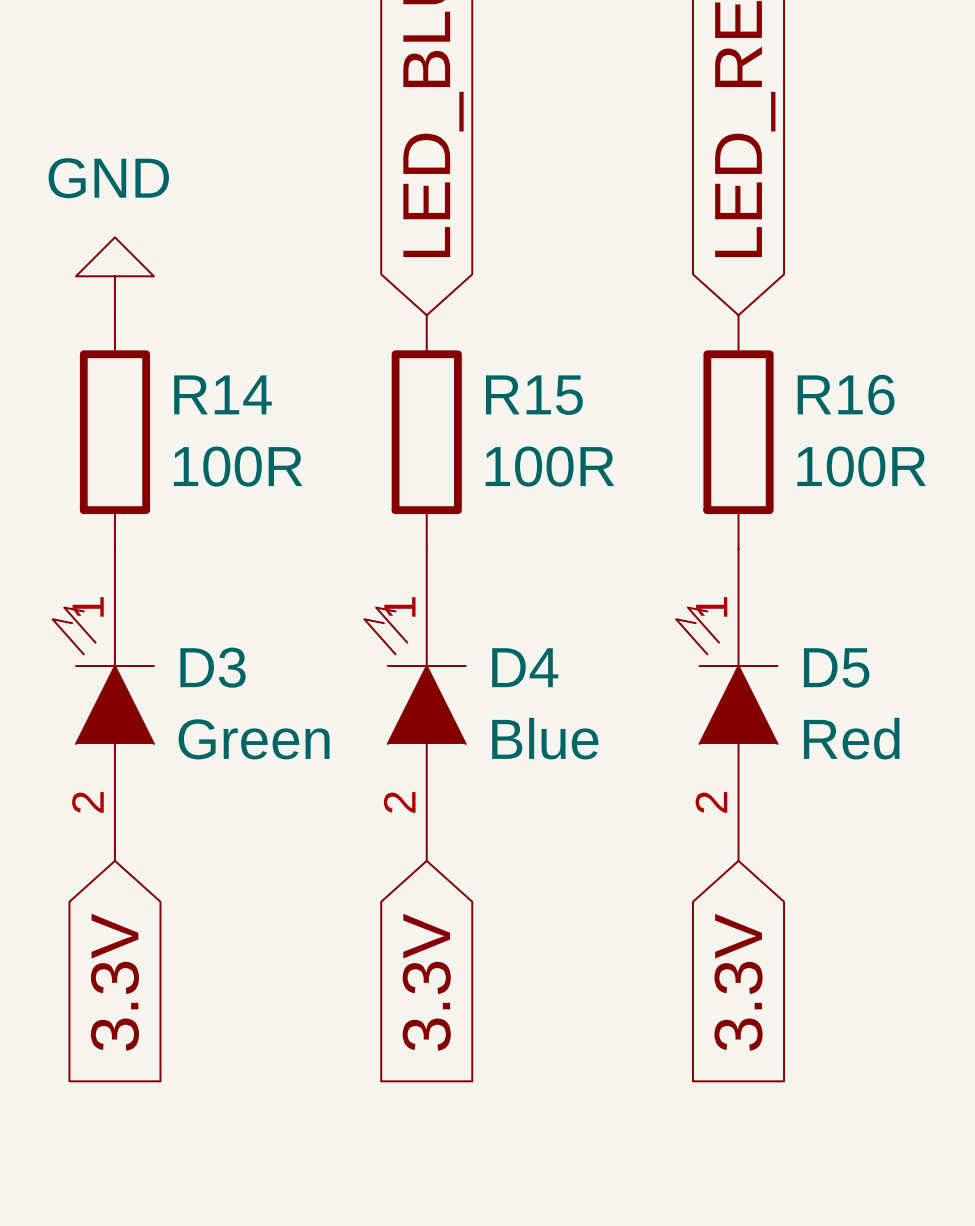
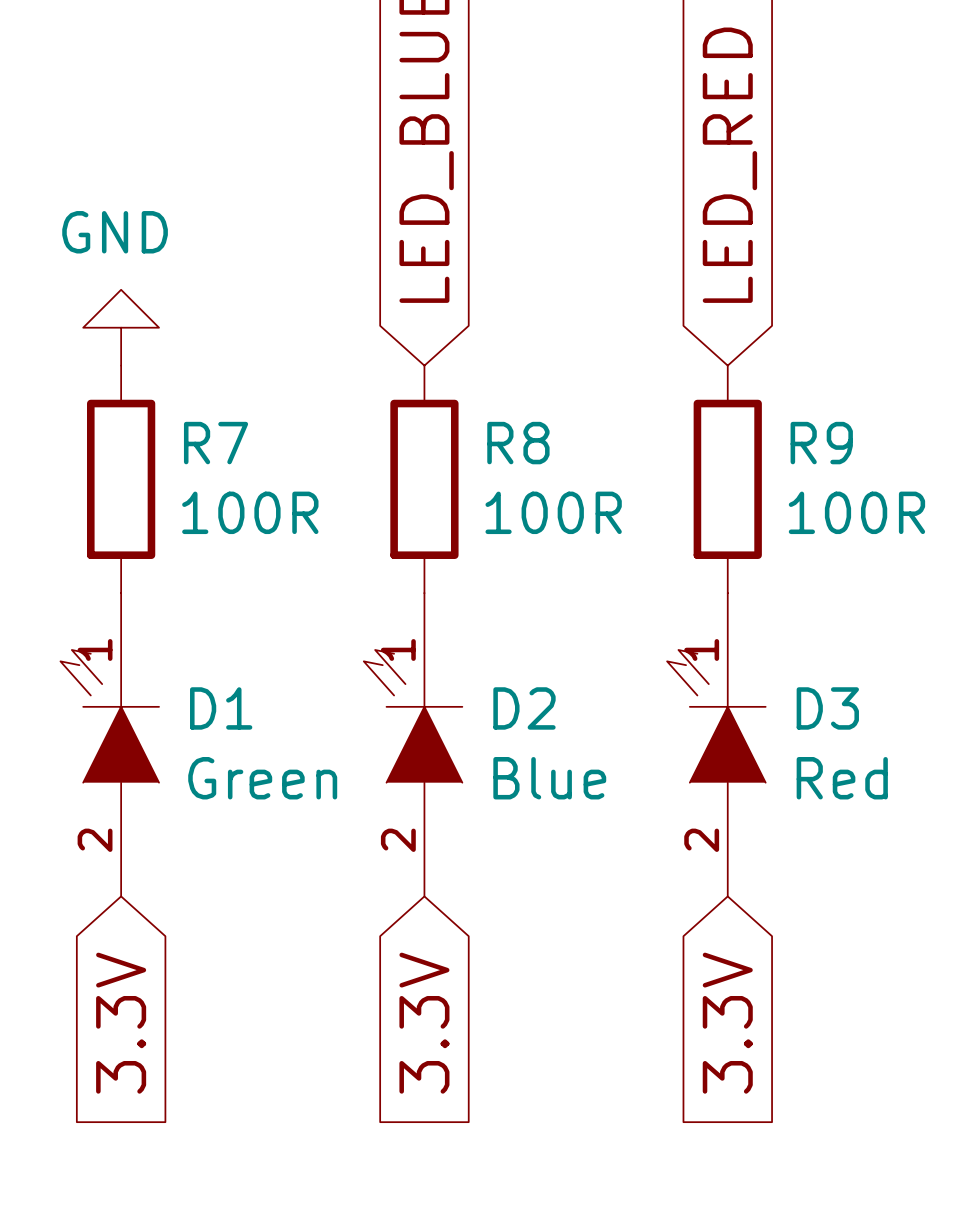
R14 name: R14 (222, 394) -> R7 (216, 443)
R16 name: R16 (846, 394) -> R9 (821, 443)
R15 name: R15 (534, 395) -> R8 (518, 443)
D3 name: D3 (213, 667) -> D1 (221, 708)
D4 name: D4 (525, 667) -> D2 (524, 708)
D5 name: D5 (836, 667) -> D3 (827, 708)

